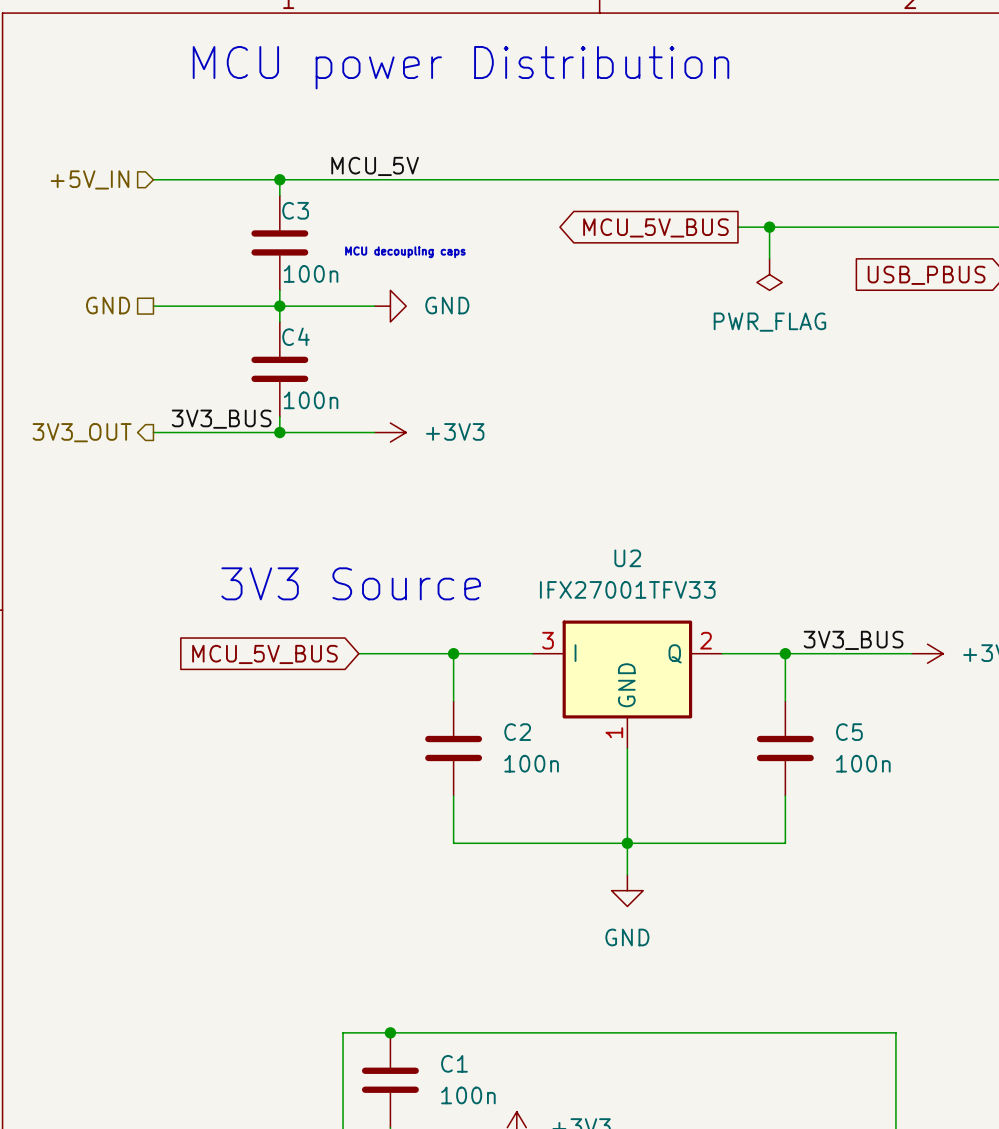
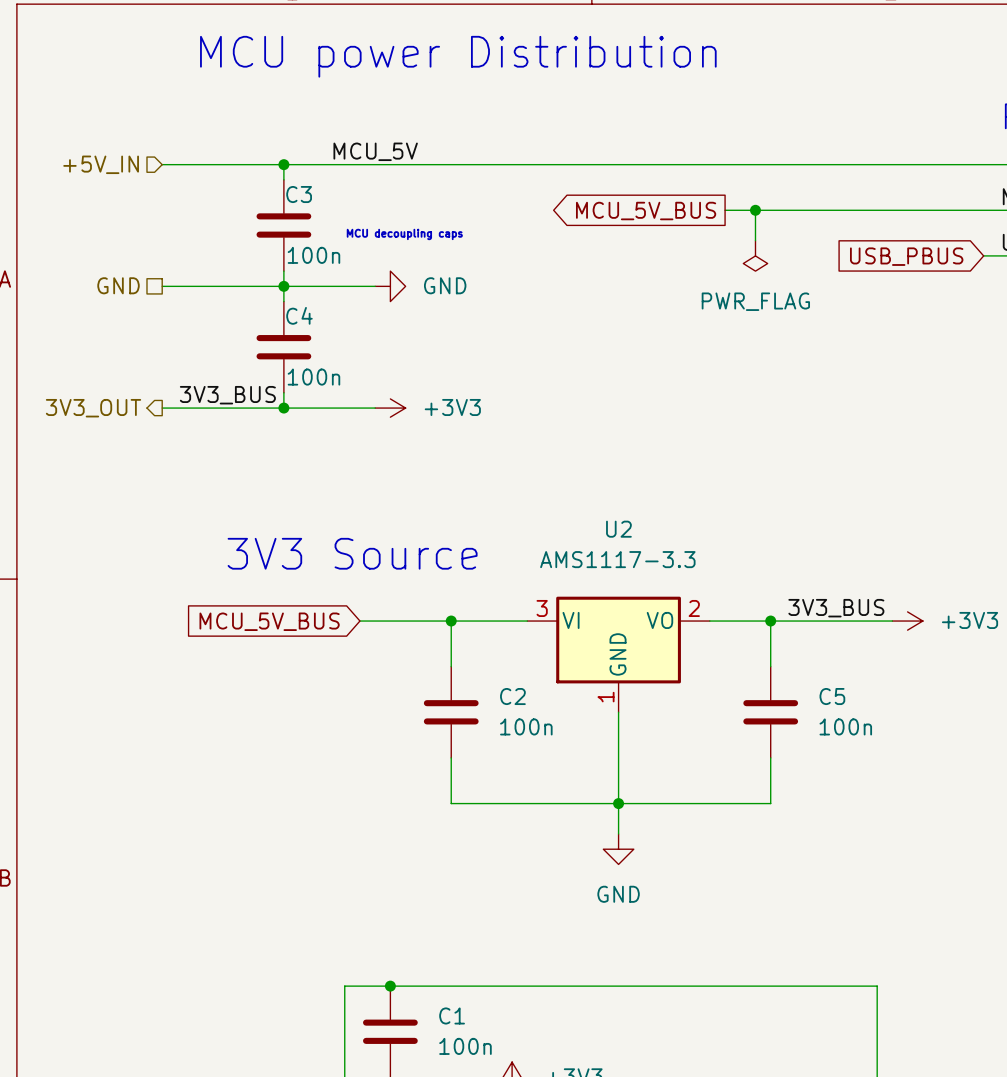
U2 value: IFX27001TFV33 (627, 589) -> AMS1117-3.3 (617, 559)
U2 symbol: [532, 620, 723, 749] -> [527, 596, 710, 713]

